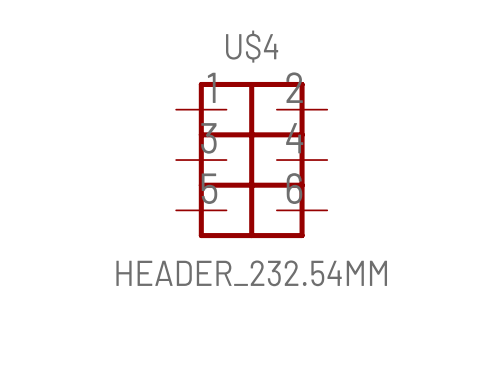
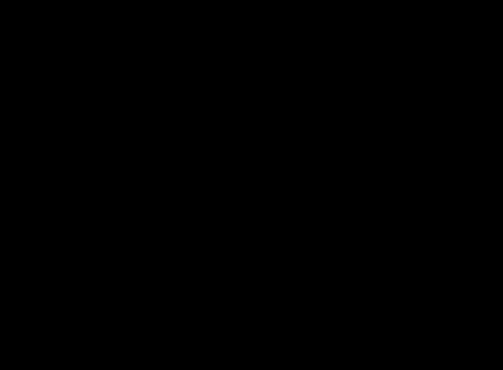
U$4: HEADER_232.54MM (251, 160) -> none

